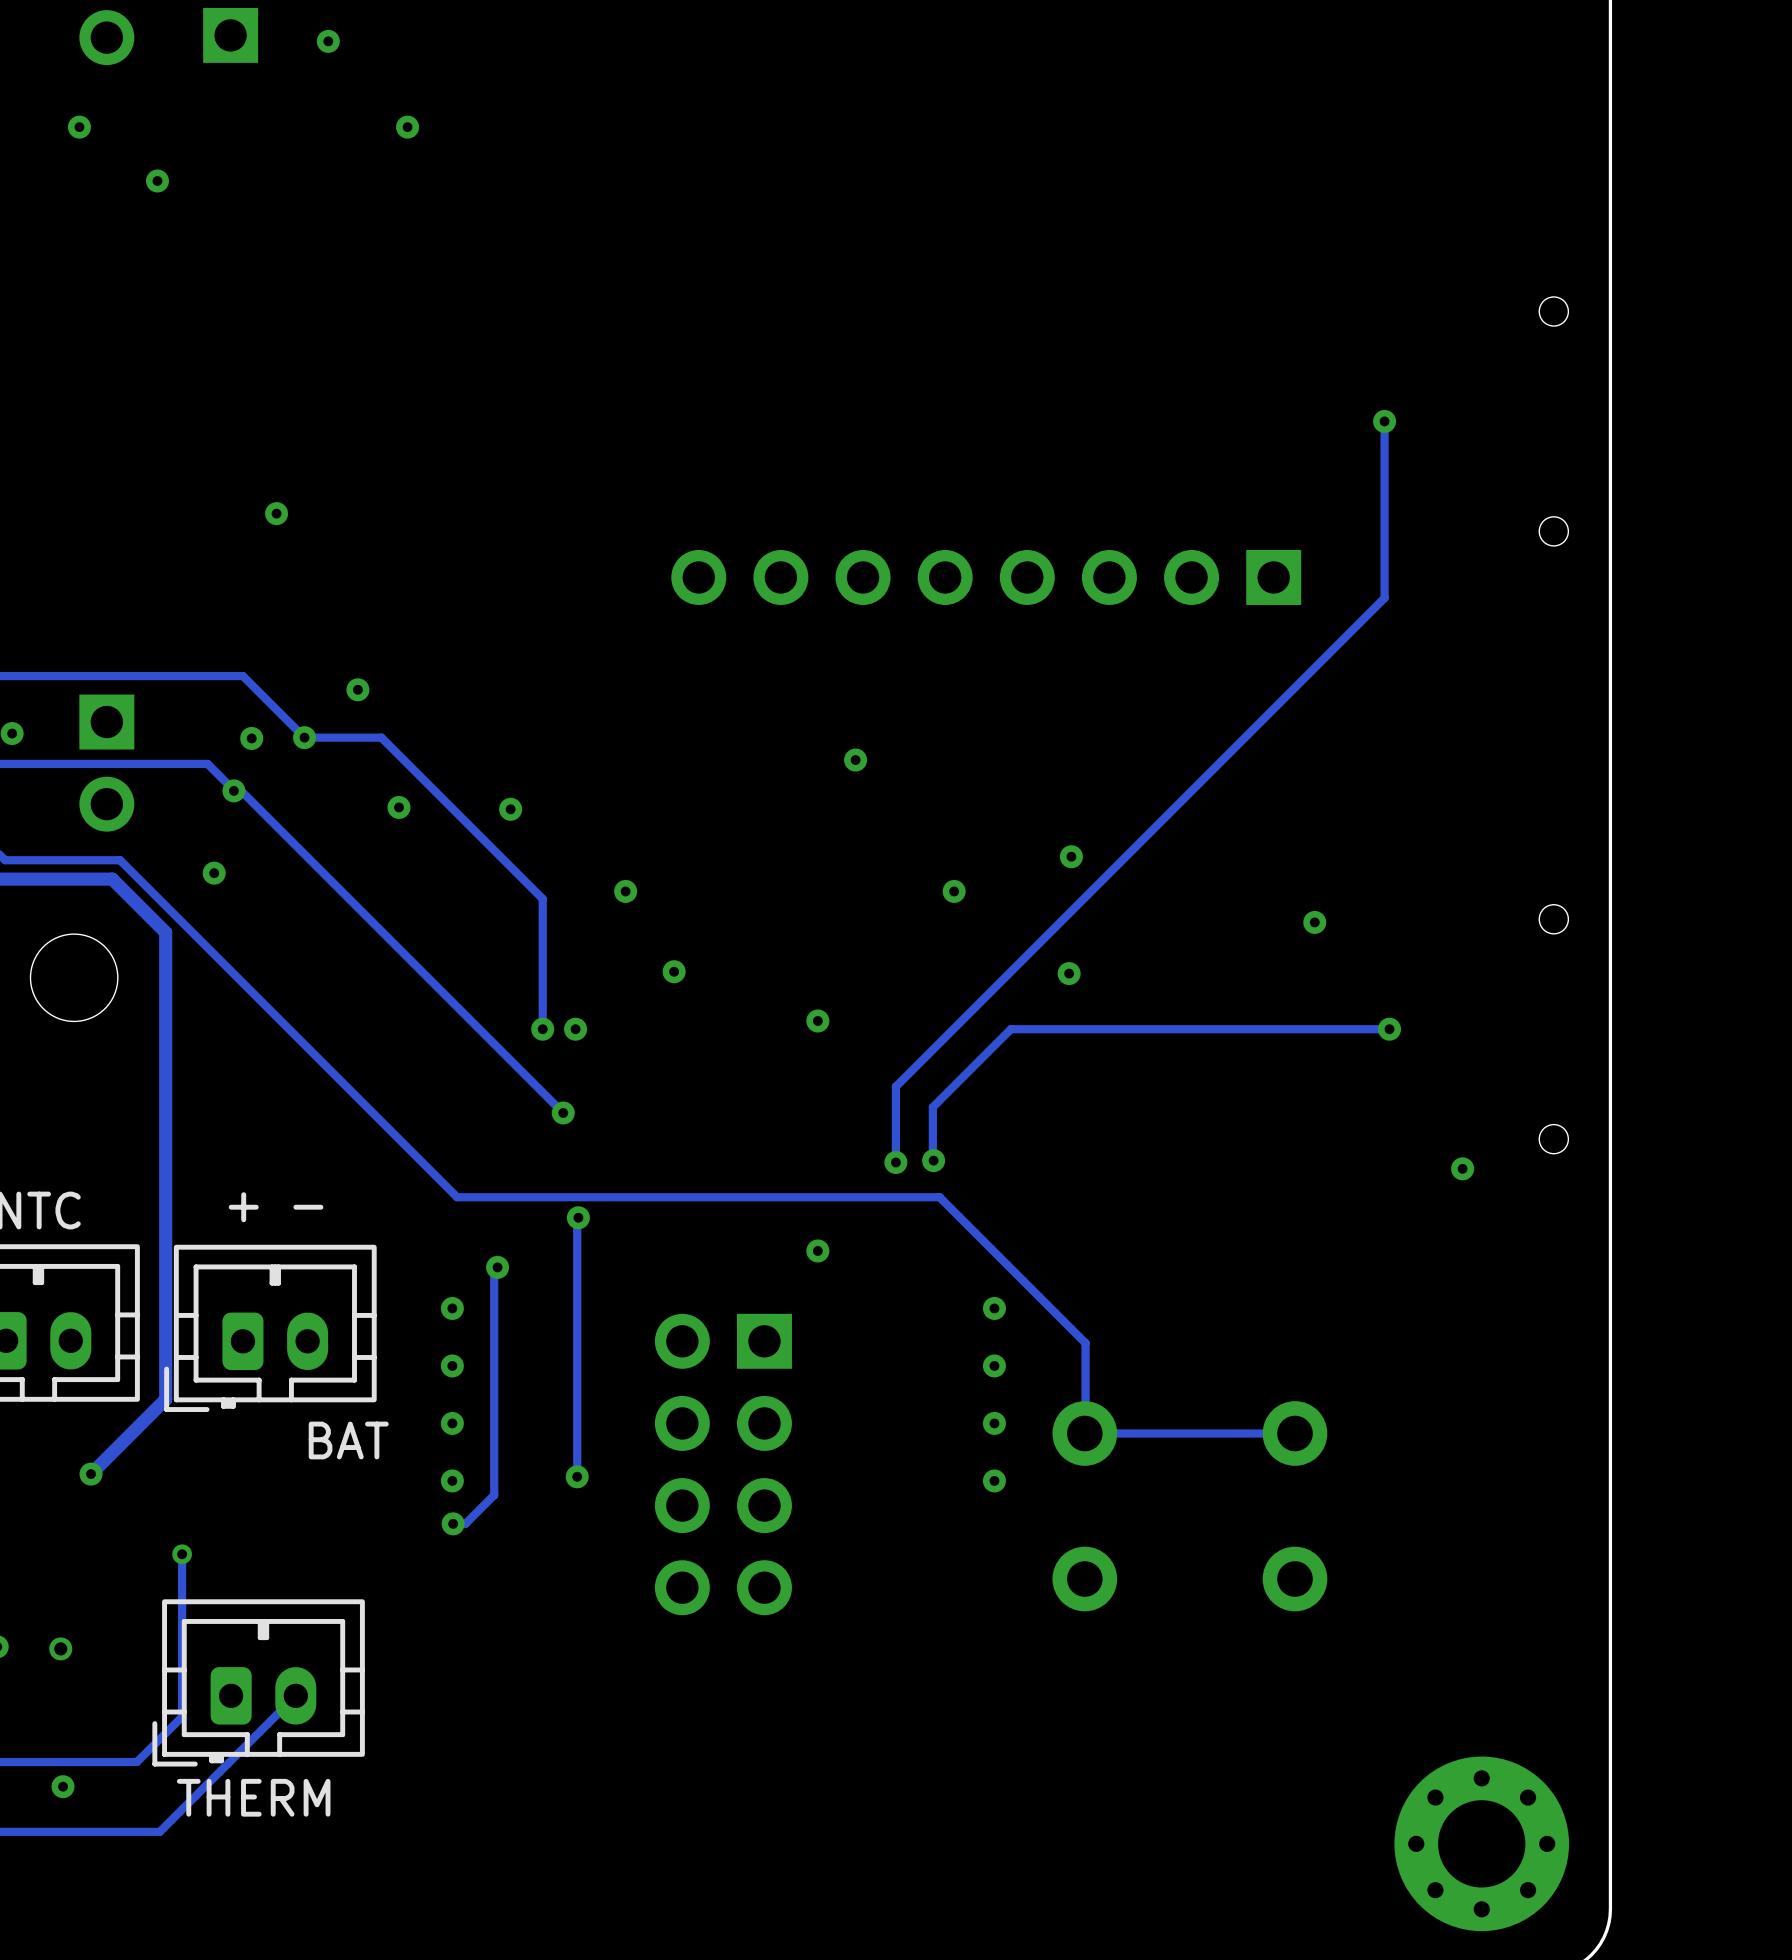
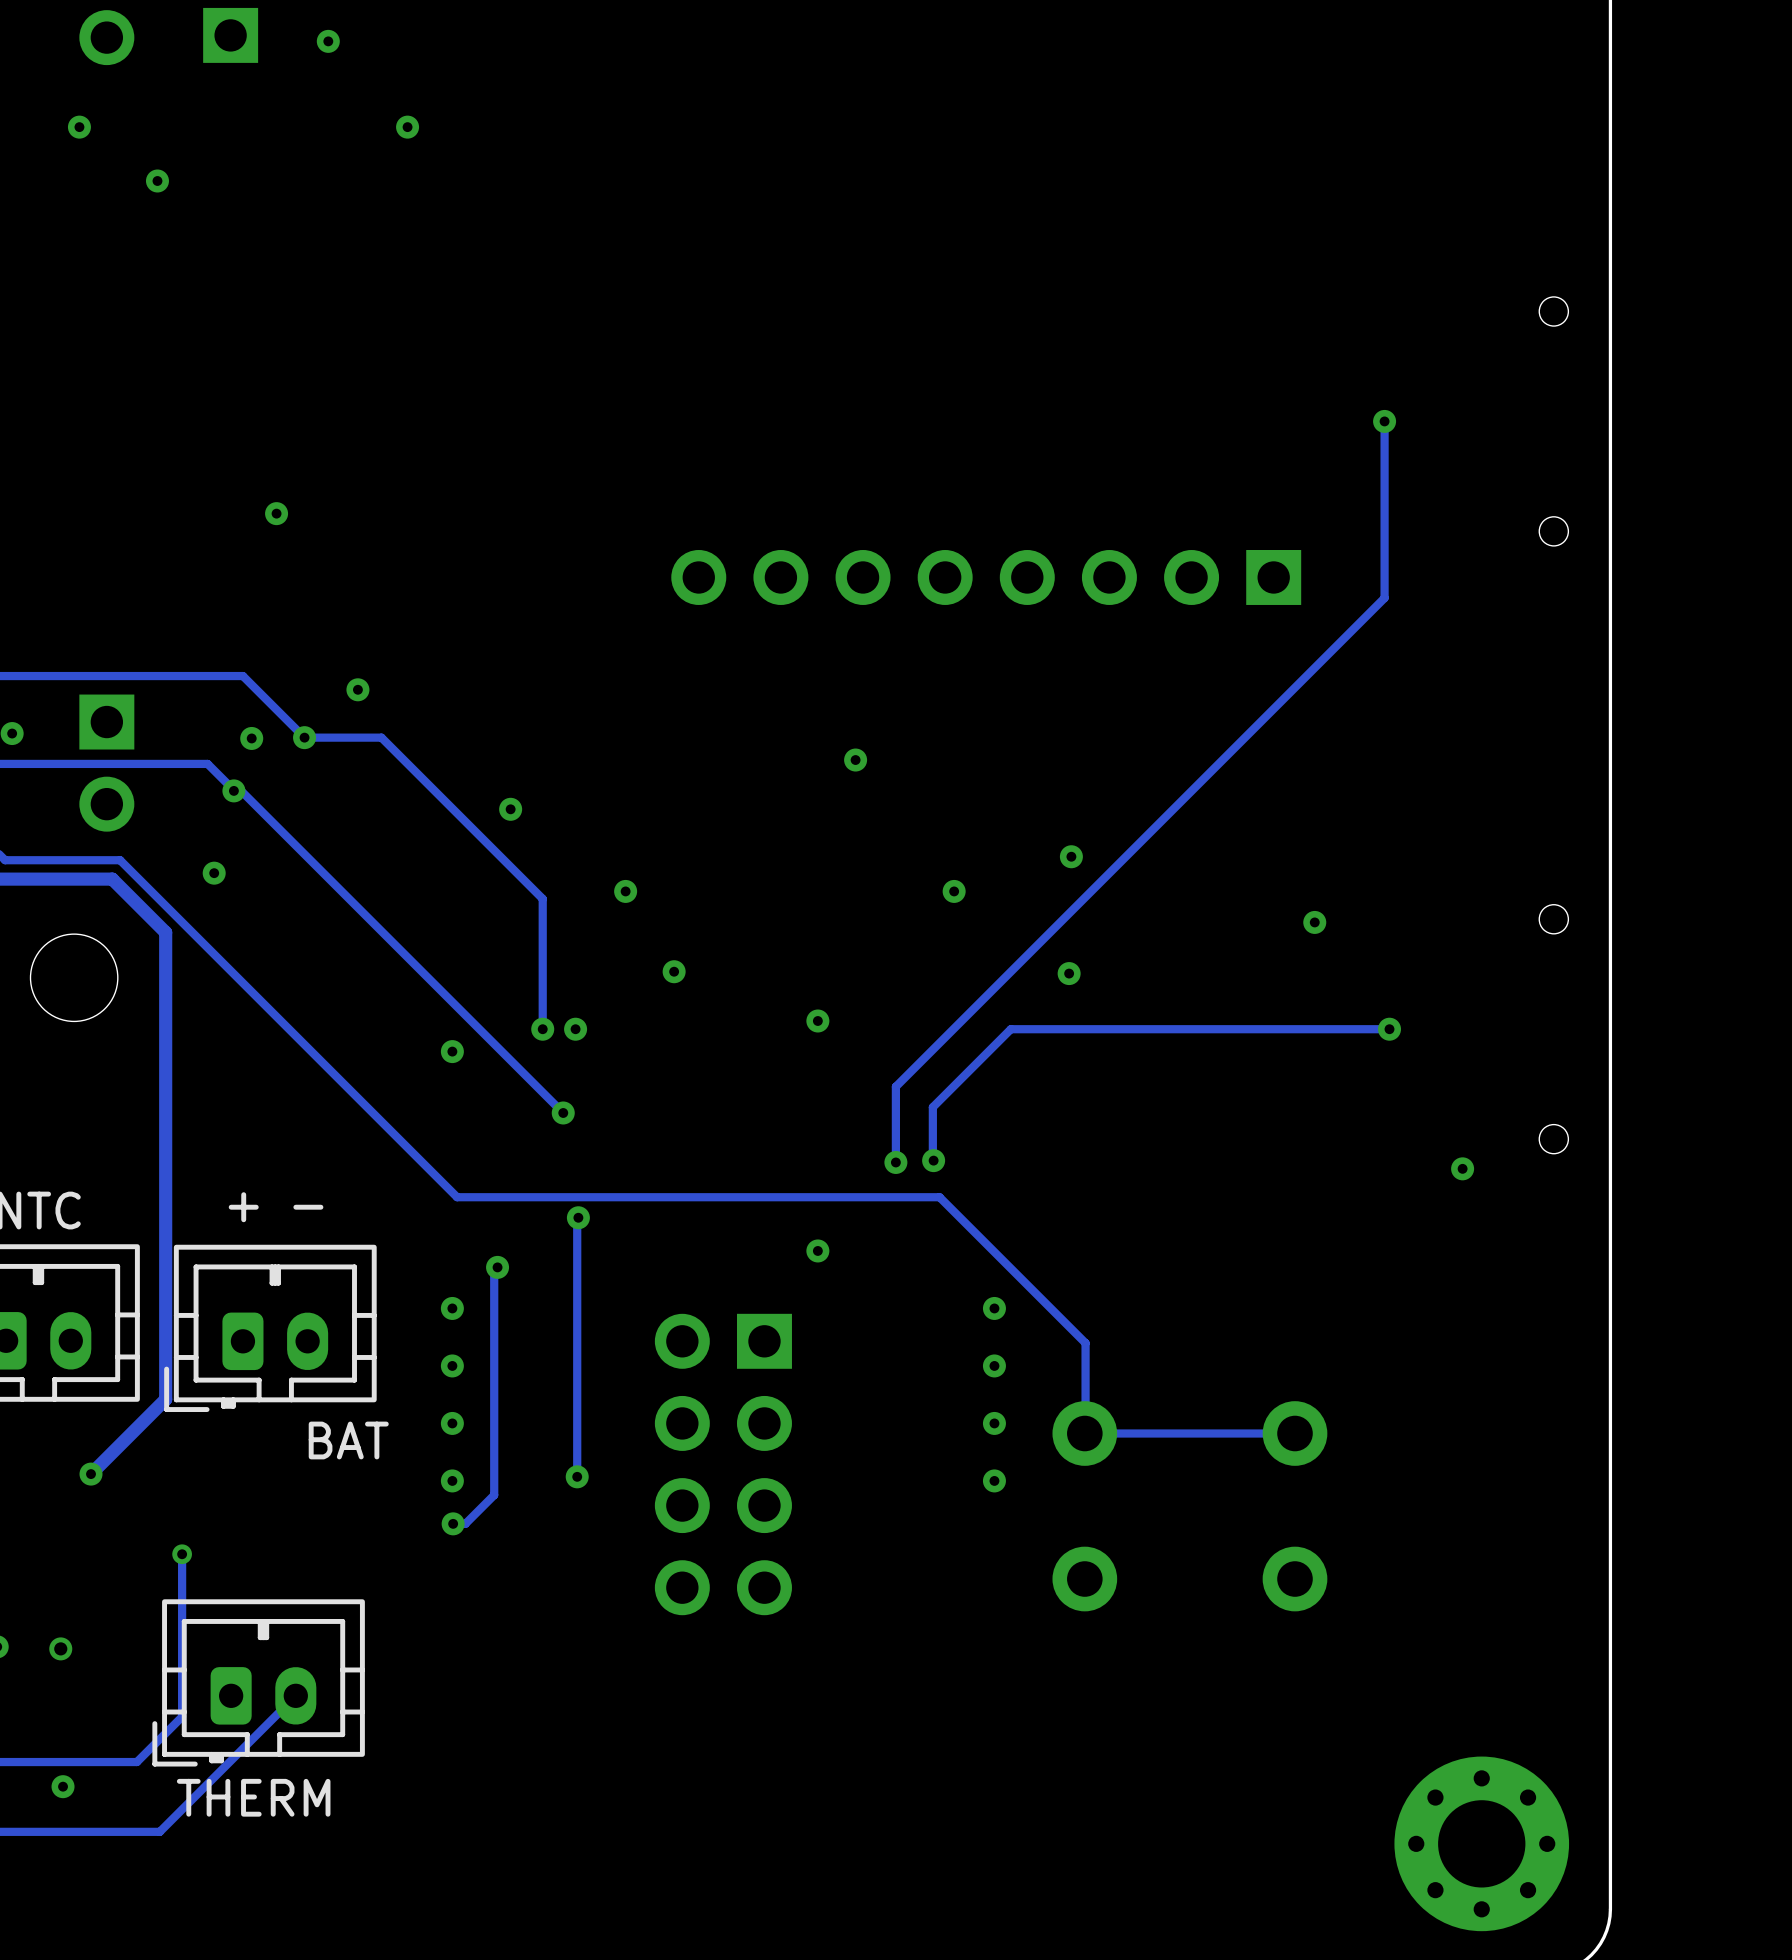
via: (398, 807) -> none
via: none -> (452, 1051)

